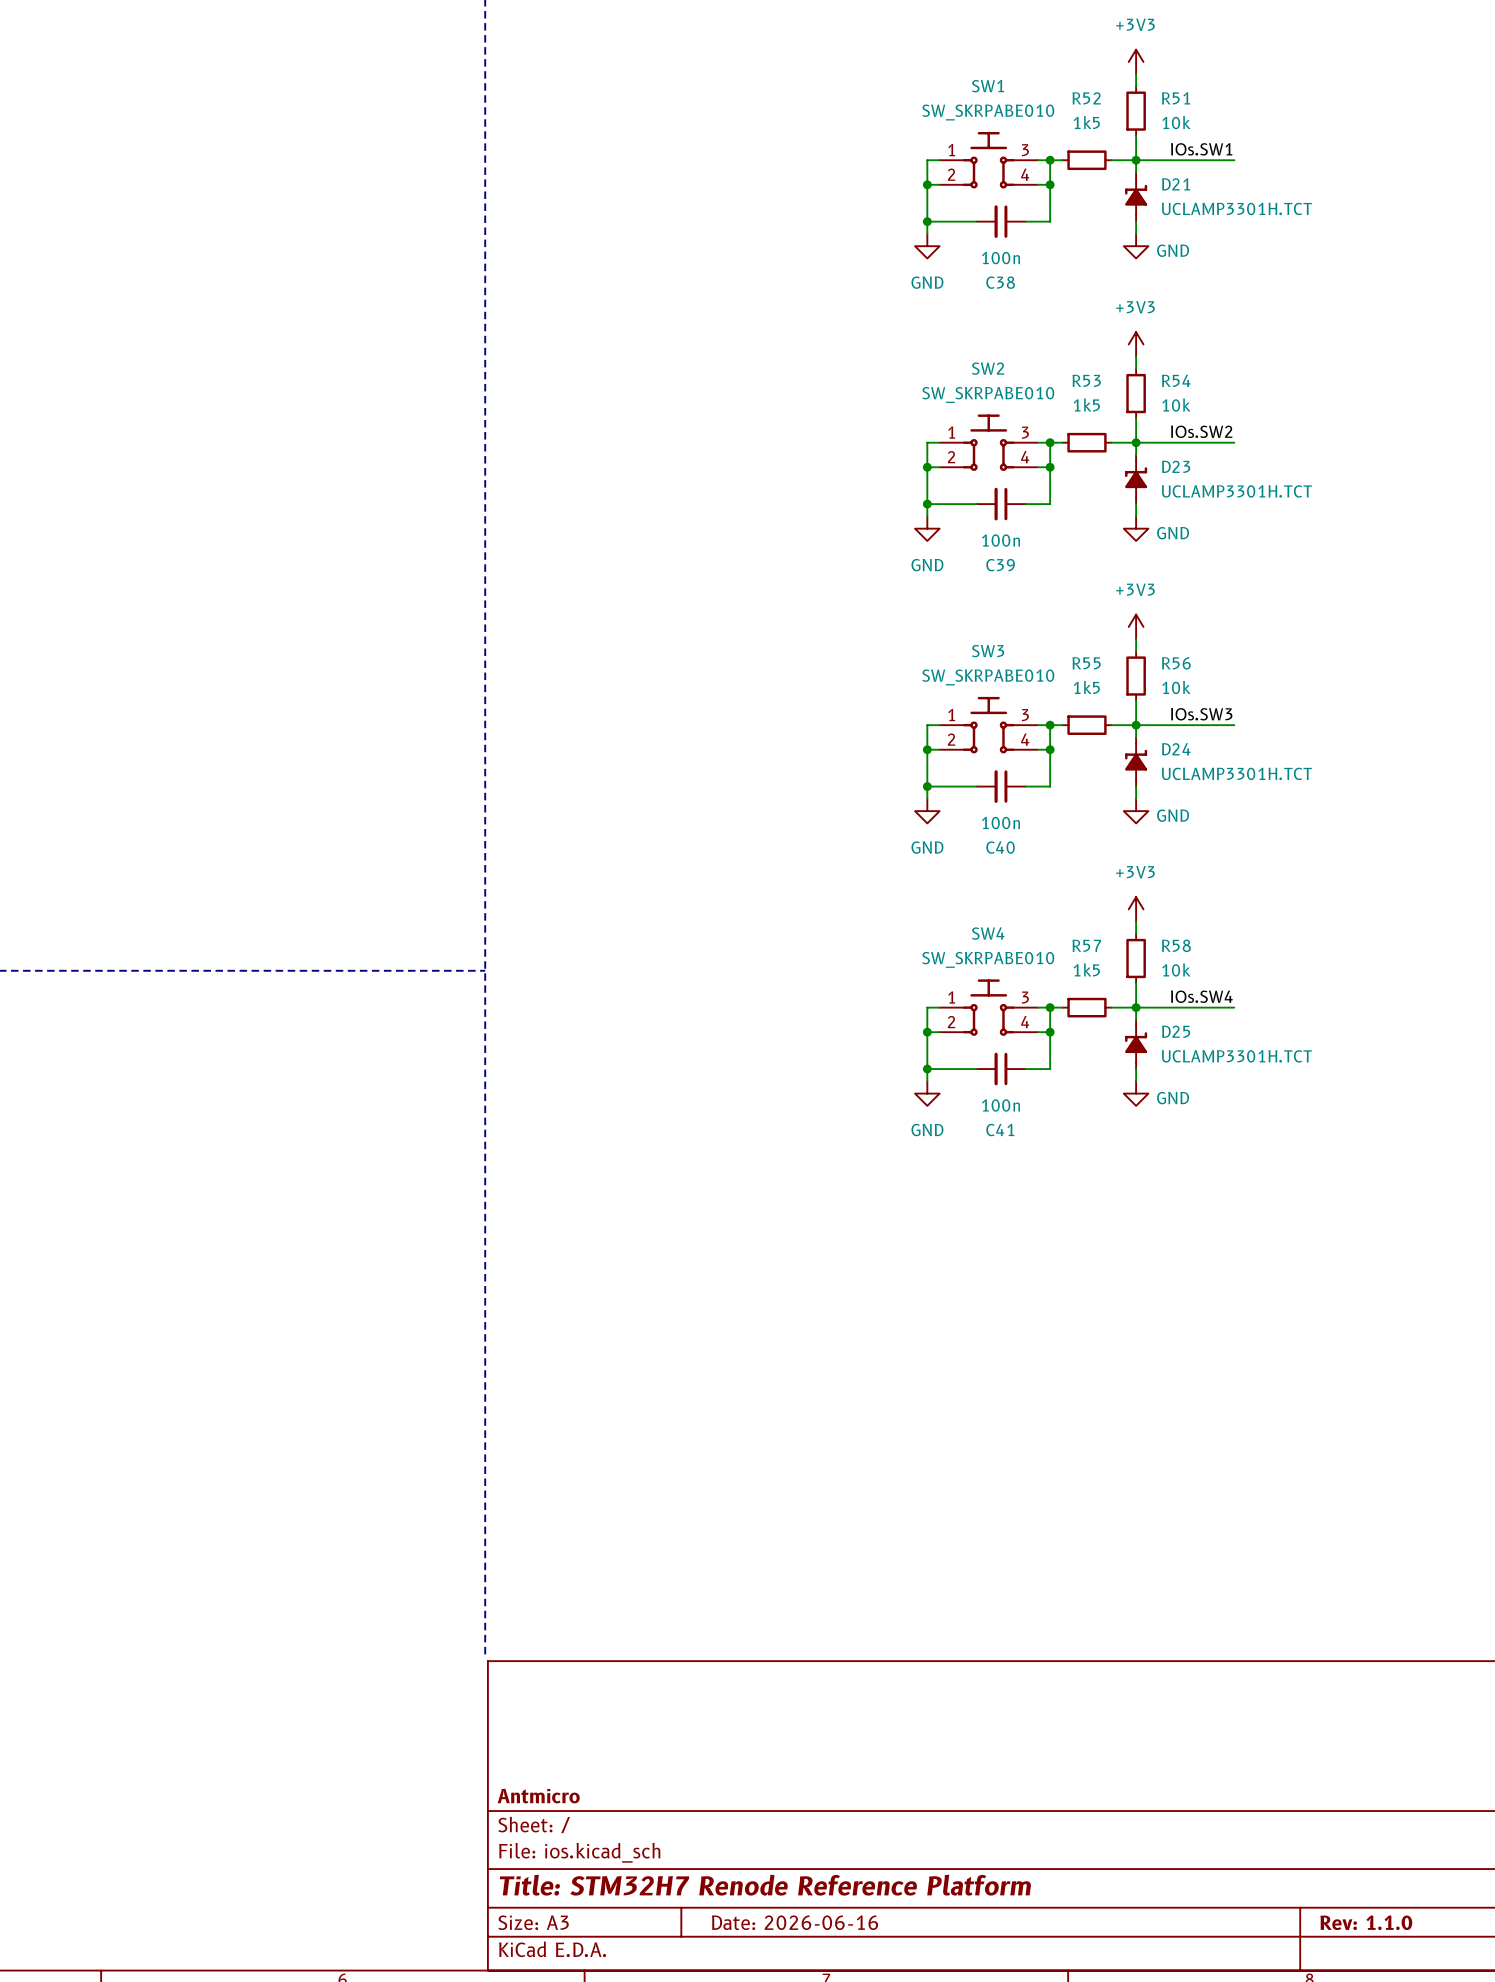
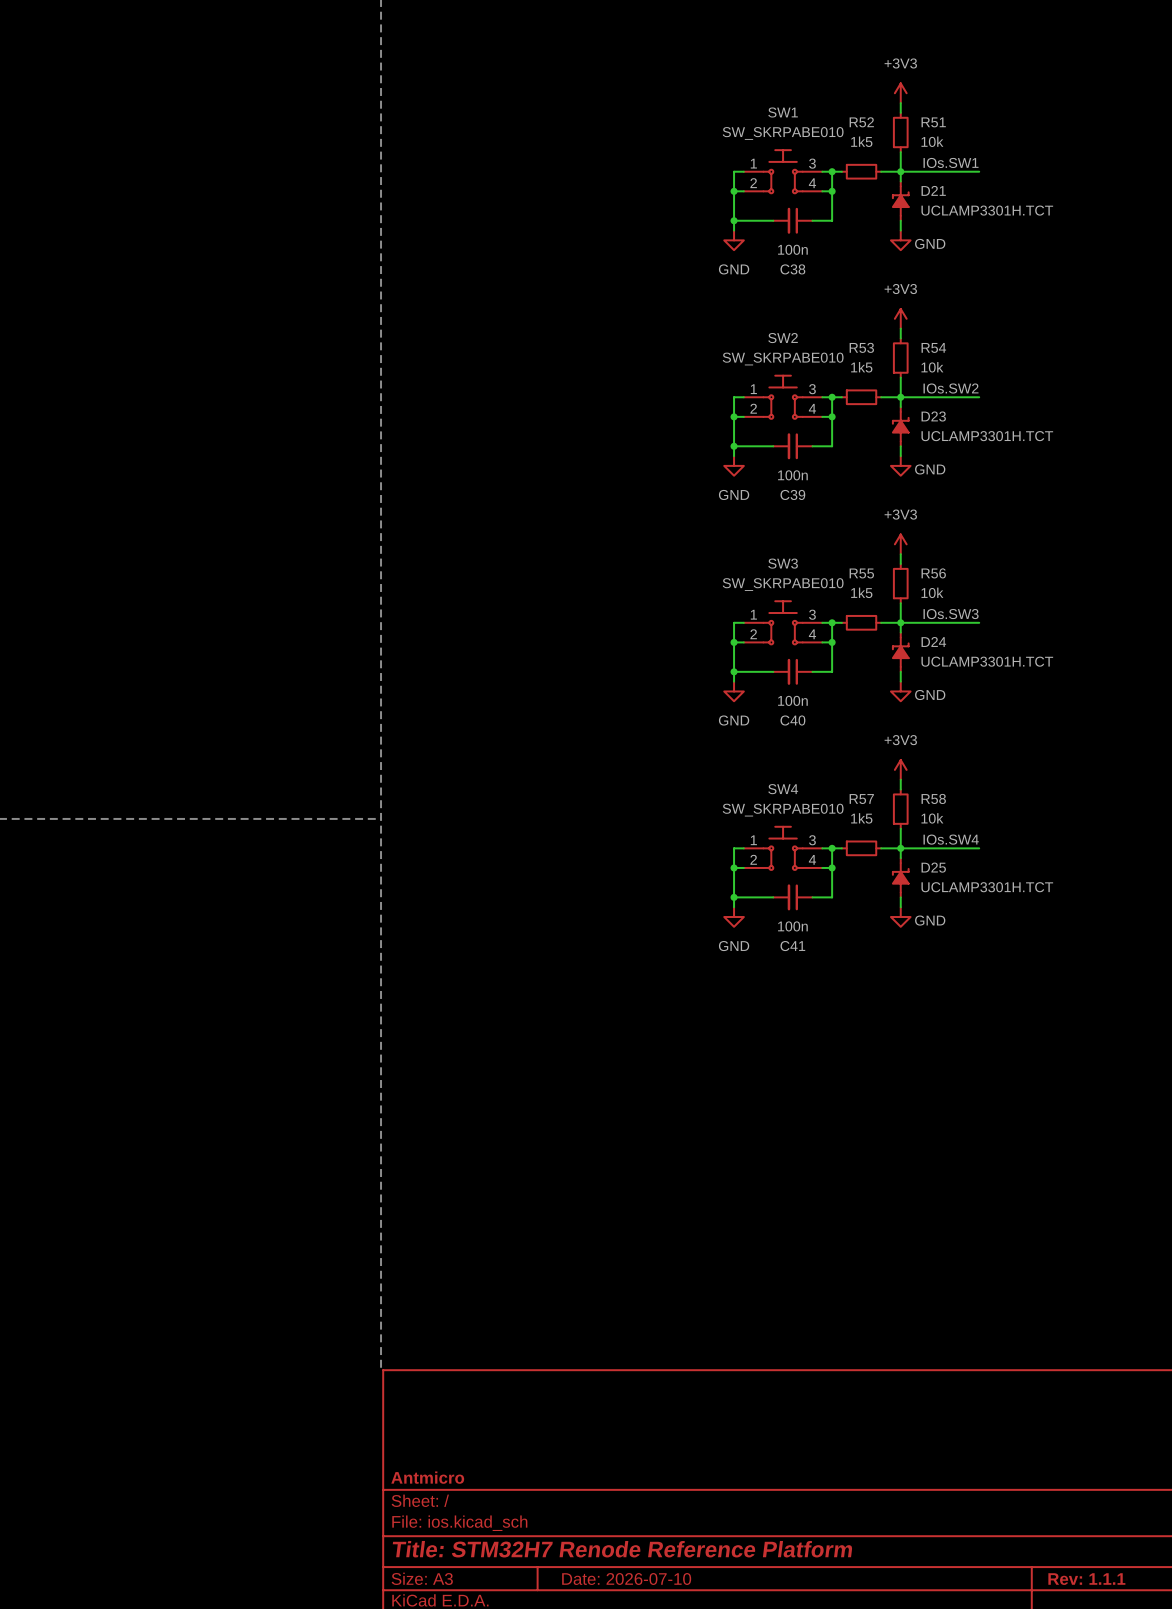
title block: Date: 2026-06-16 (795, 1922) -> Date: 2026-07-10 (626, 1579)
title block: Rev: 1.1.0 (1366, 1922) -> Rev: 1.1.1 (1086, 1579)

